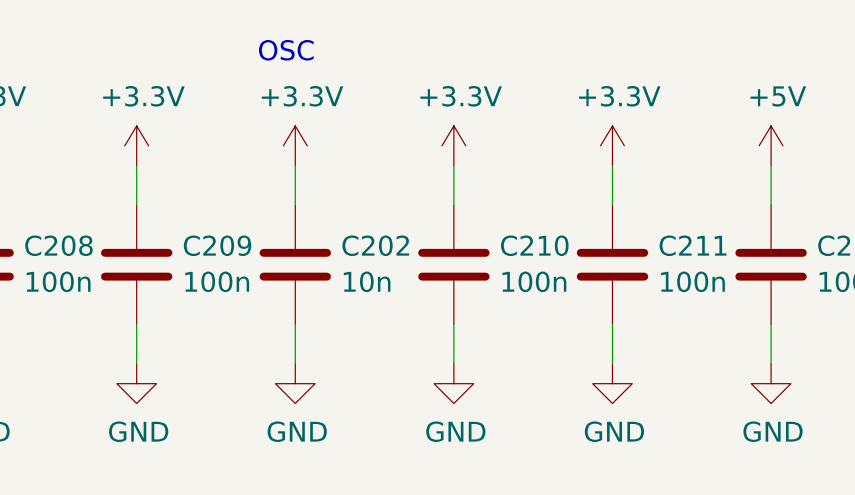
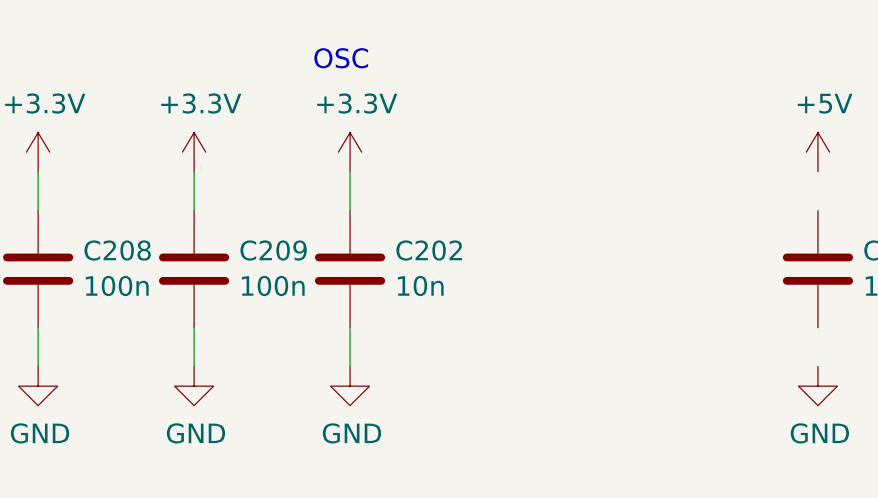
power symbol: +3.3V (453, 145) -> none
power symbol: +3.3V (612, 145) -> none
wire: (453, 165) (453, 205) -> none
wire: (612, 165) (612, 205) -> none
wire: (771, 165) (771, 205) -> none
C210: 100n (453, 264) -> none
C211: 100n (612, 264) -> none
wire: (453, 324) (453, 363) -> none
wire: (612, 324) (612, 363) -> none
wire: (771, 324) (771, 363) -> none
power symbol: GND (453, 383) -> none
power symbol: GND (612, 383) -> none

